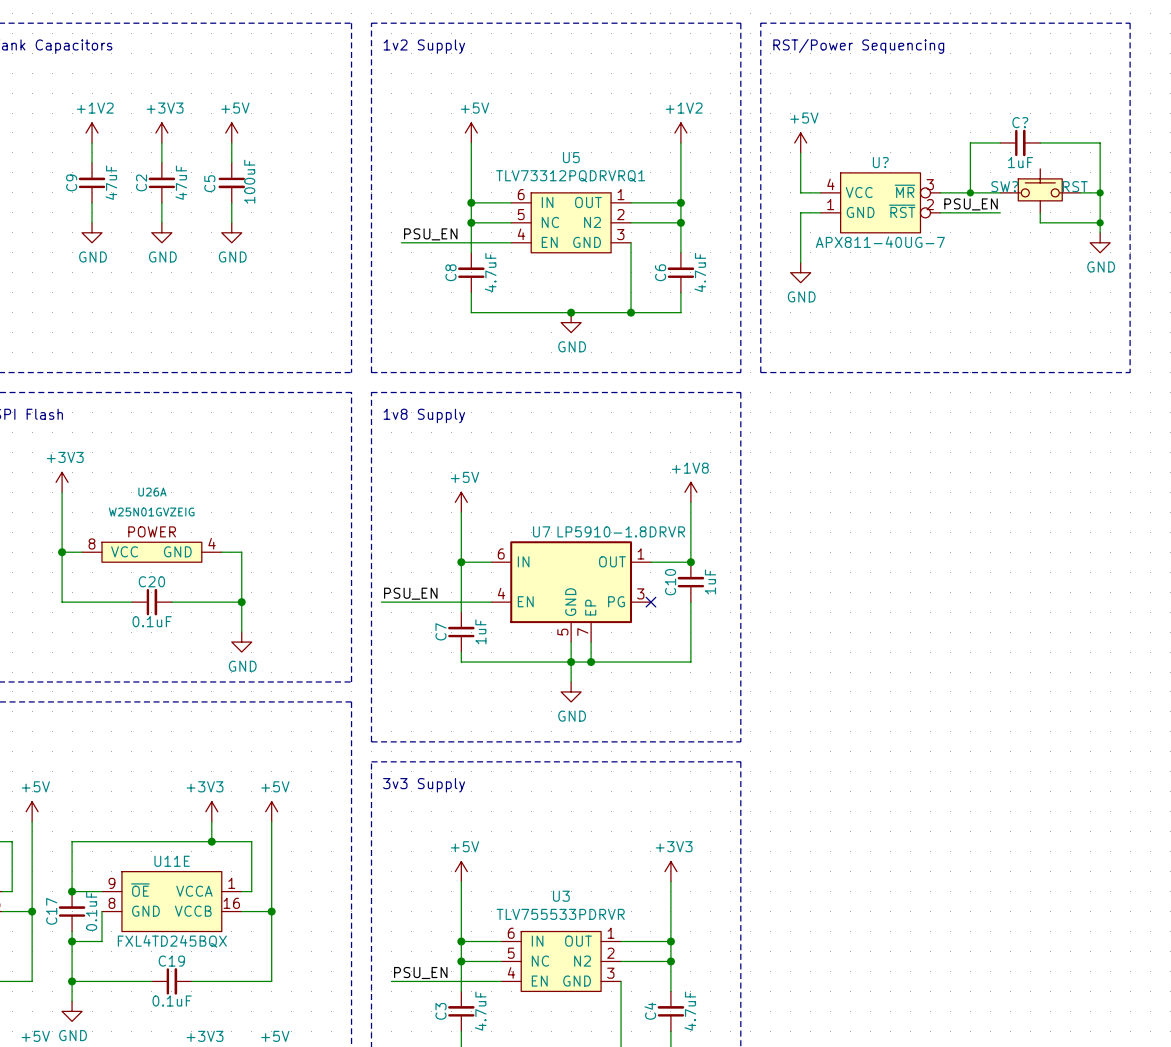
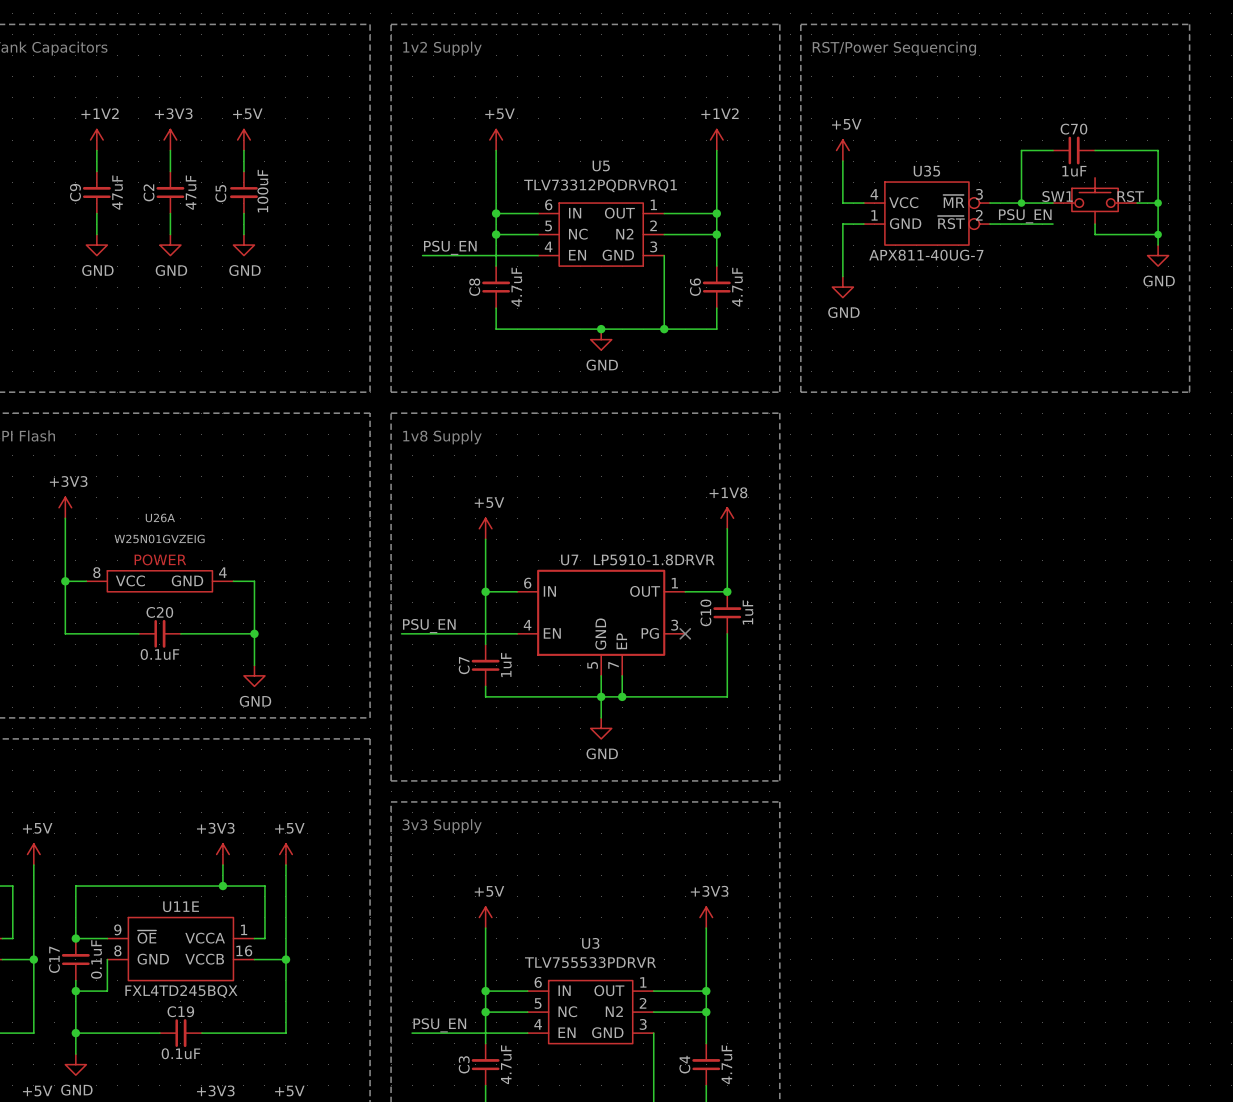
C? name: C? (1020, 122) -> C70 (1073, 129)
U? name: U? (880, 162) -> U35 (926, 171)
SW? name: SW? (1004, 186) -> SW1 (1057, 196)

